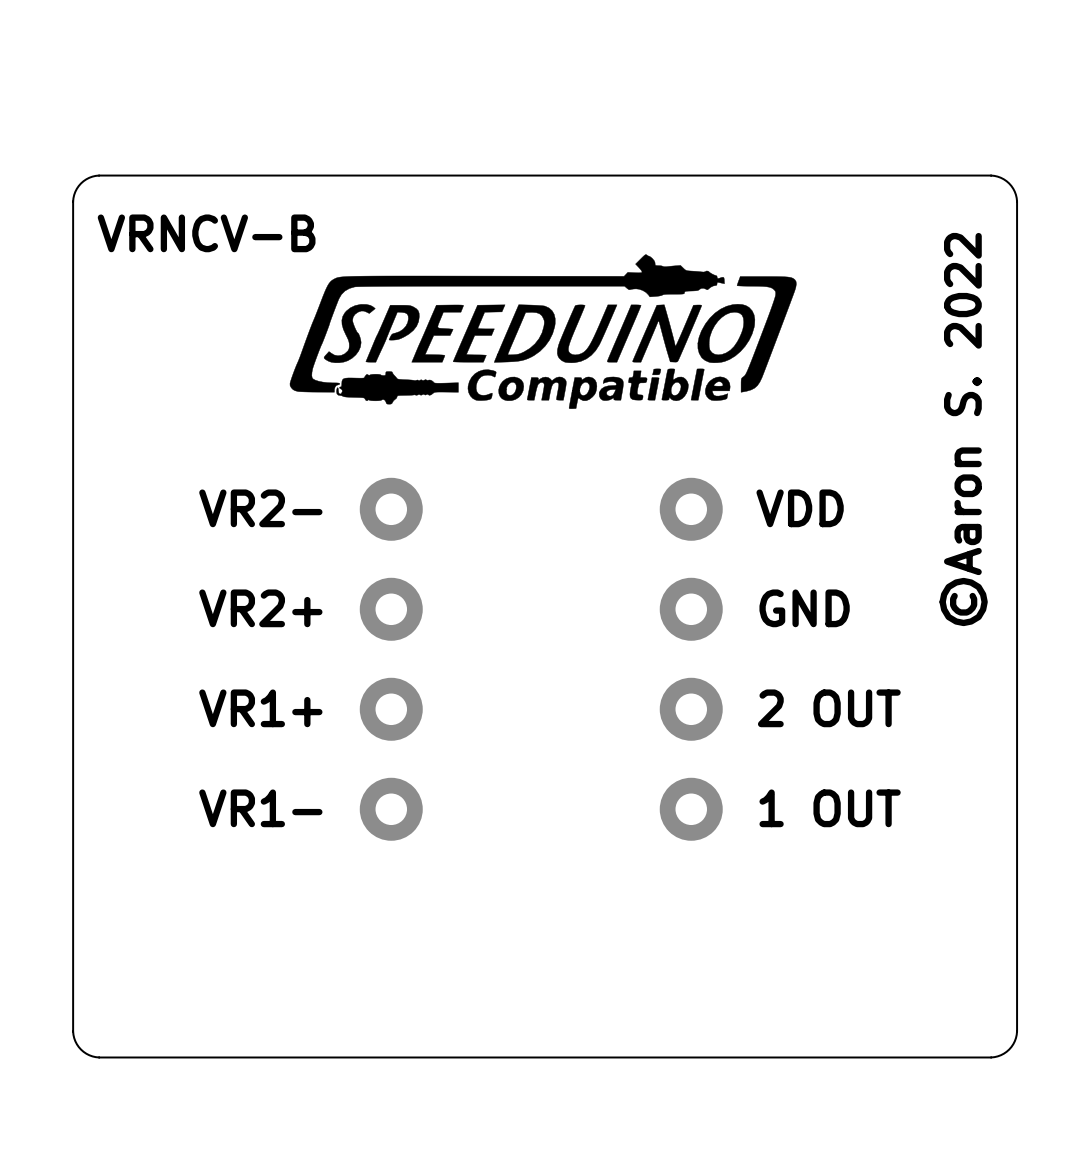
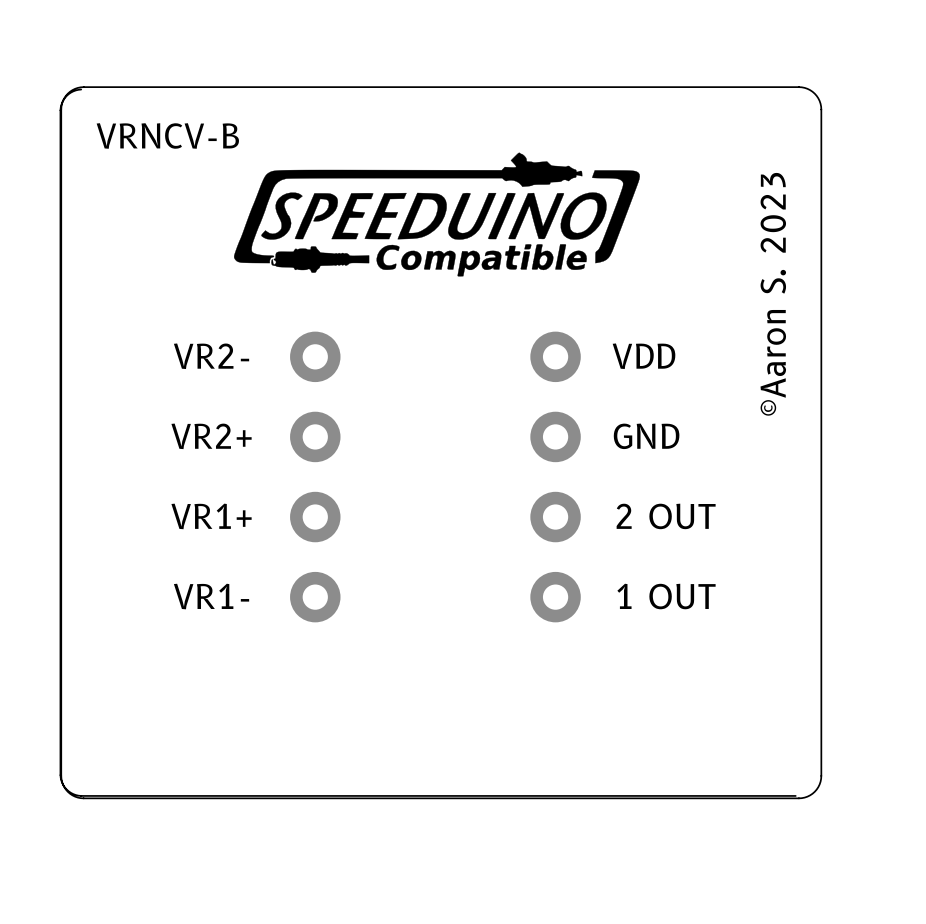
board edge: none -> (798, 87) (83, 87) (75, 88) (67, 93) (62, 100) (61, 109) (61, 775) (62, 784) (67, 791) (75, 796) (83, 798) (798, 798) (807, 796) (814, 791) (819, 784) (821, 775) (821, 109) (819, 100) (814, 93) (807, 88) (798, 87)
board edge: (99, 175) (991, 175) (1000, 177) (1009, 183) (1014, 191) (1017, 201) (1017, 1031) (1014, 1041) (1009, 1049) (1000, 1055) (991, 1057) -> none
text: ©Aaron S. 2022 (963, 429) -> ©Aaron S. 2023 (773, 294)

